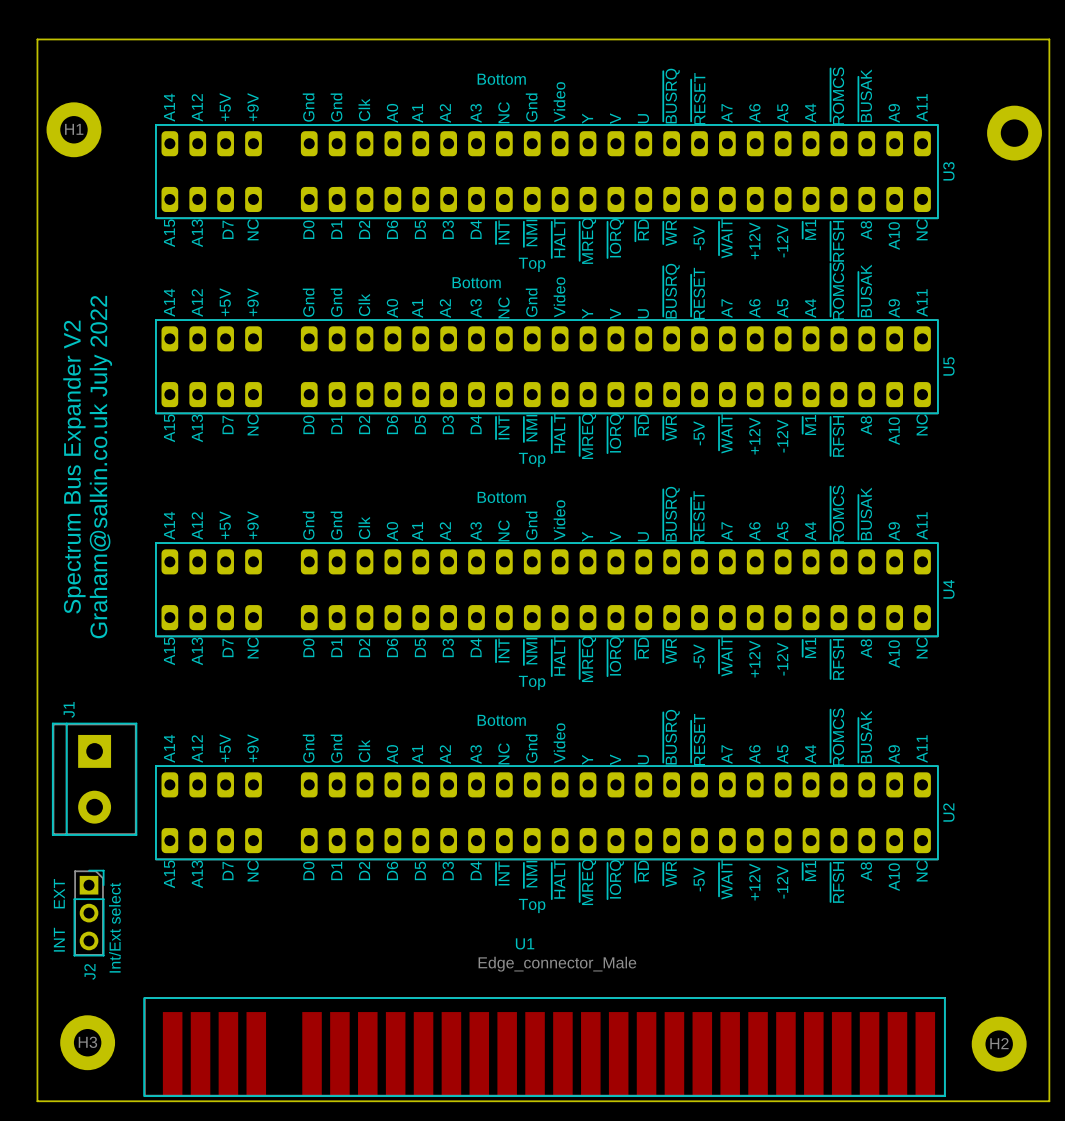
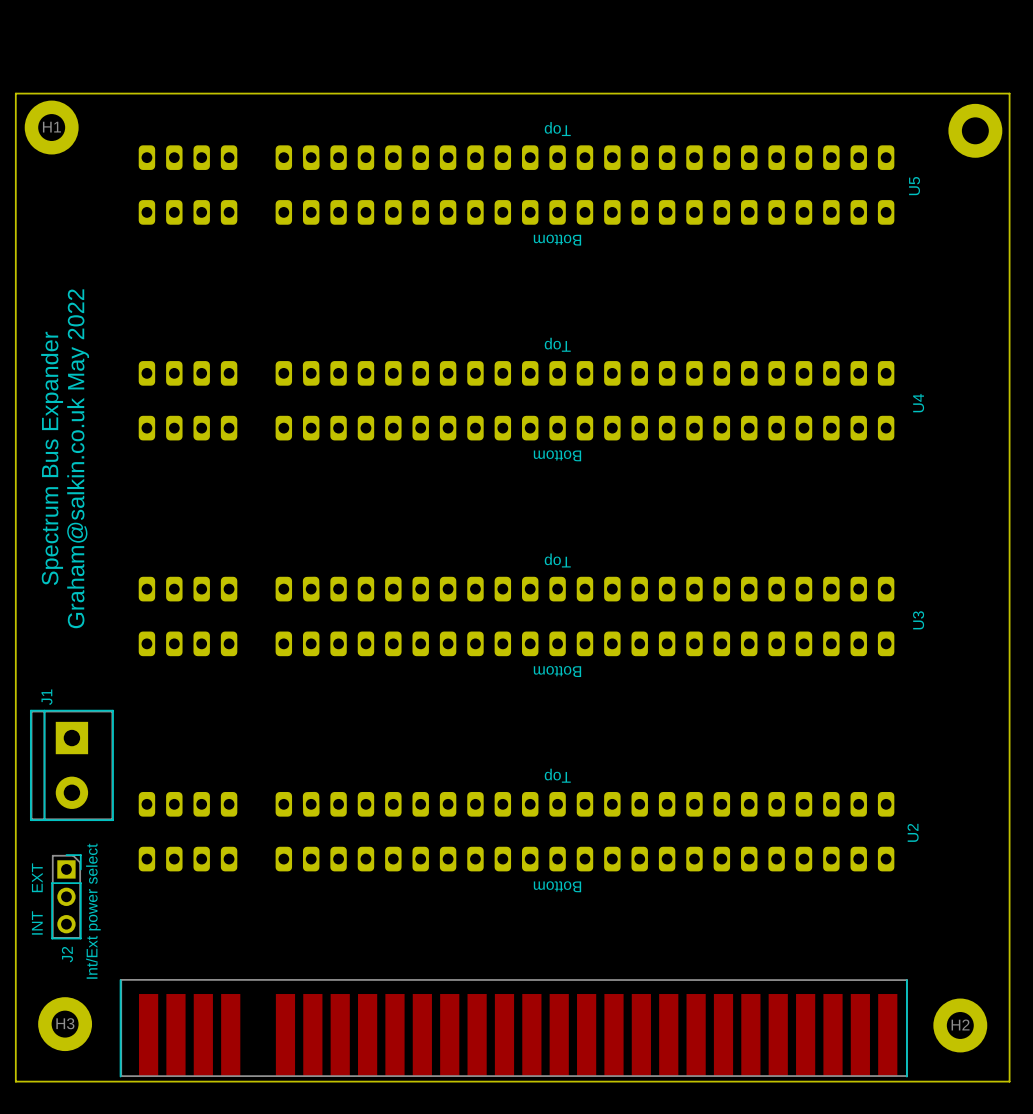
U3 footprint: [155, 67, 939, 262] -> [138, 576, 895, 657]
board edge: (37, 95) (37, 39) (1049, 39) (1049, 95) -> (15, 93) (1009, 93)
U5 footprint: [155, 262, 939, 457] -> [138, 145, 895, 225]
text: Spectrum Bus Expander V2 (74, 467) -> Spectrum Bus Expander (52, 458)
text: Graham@salkin.co.uk July 2022 (100, 467) -> Graham@salkin.co.uk May 2022 (78, 458)
U4 footprint: [155, 485, 939, 680] -> [138, 360, 895, 441]
U2 footprint: [155, 708, 939, 903] -> [138, 791, 895, 872]
J2 value: Int/Ext select (114, 927) -> Int/Ext power select (93, 911)
part: none -> (513, 1028)
U1: Edge_connector_Male (544, 1047) -> none

